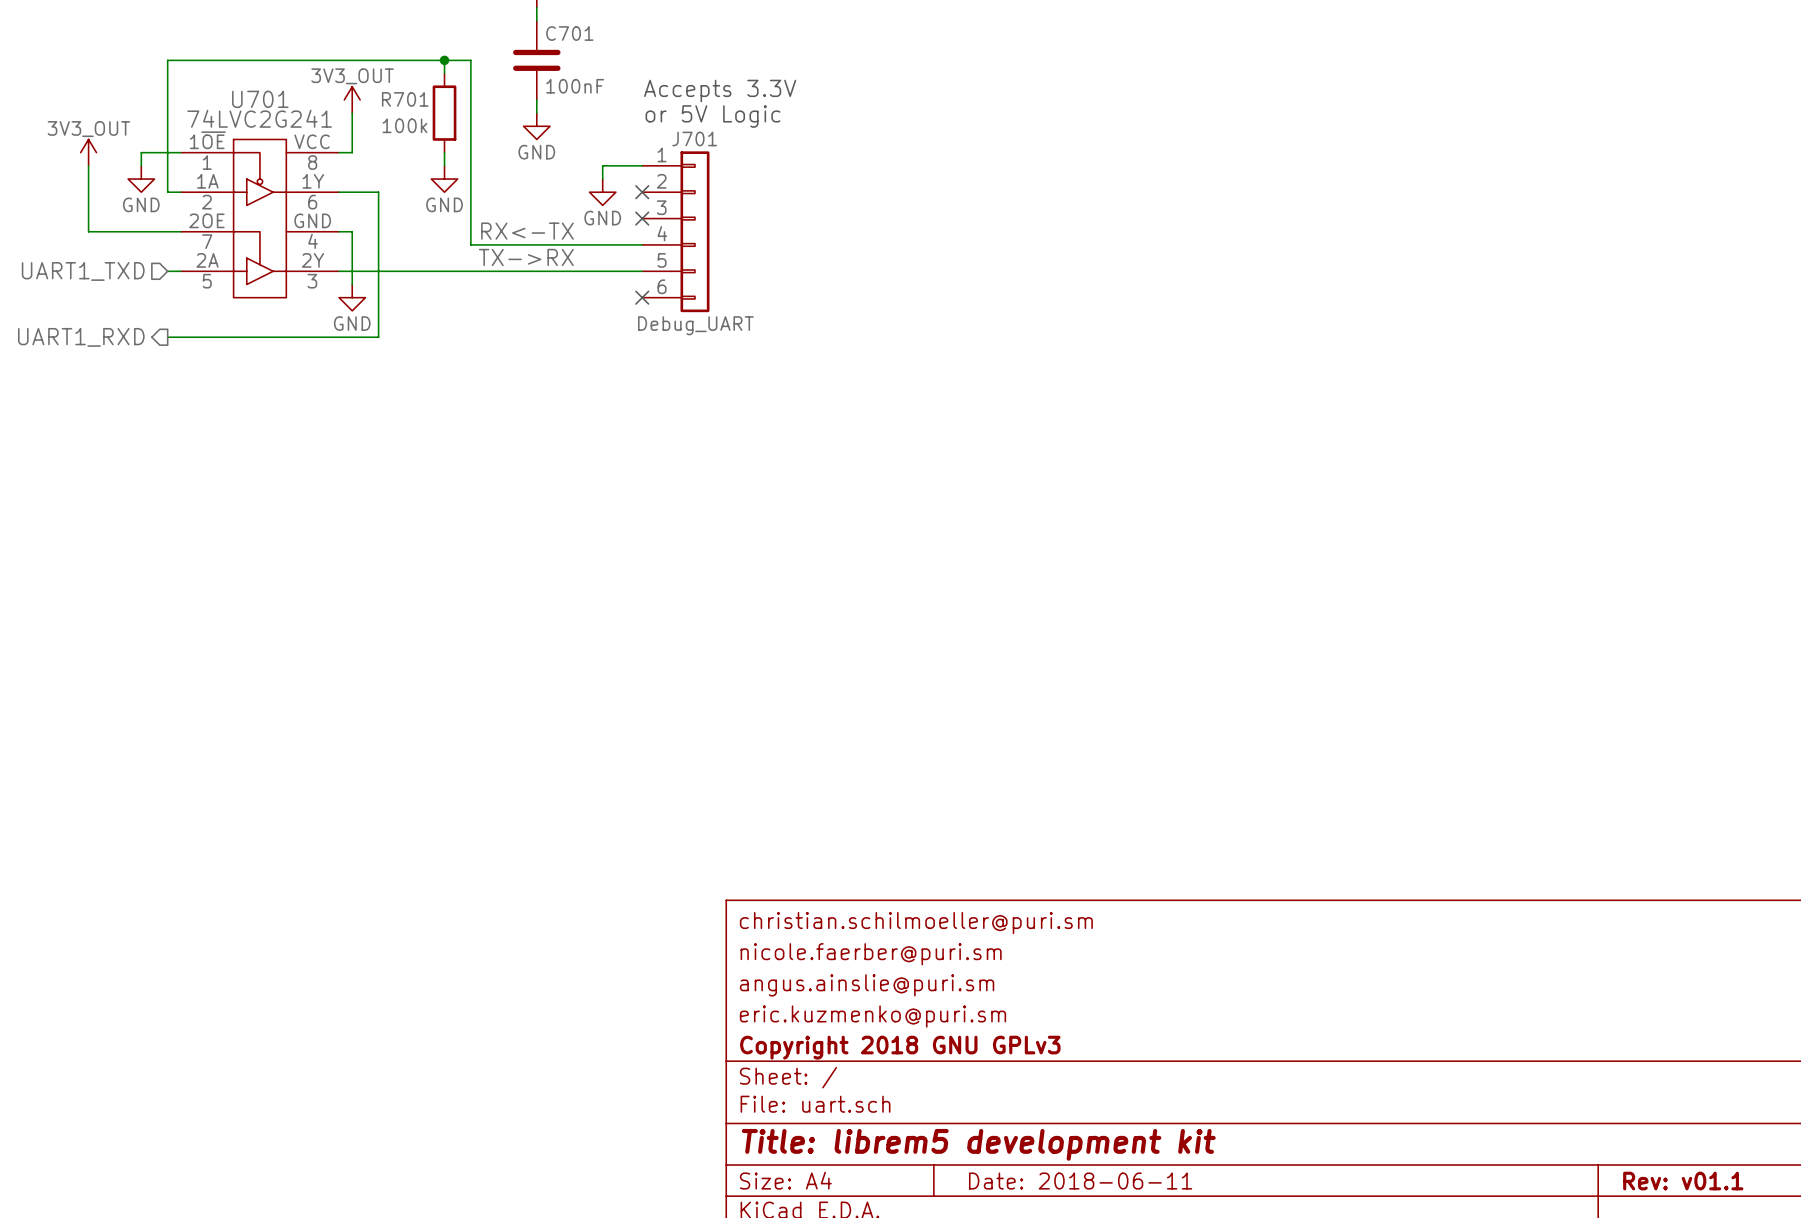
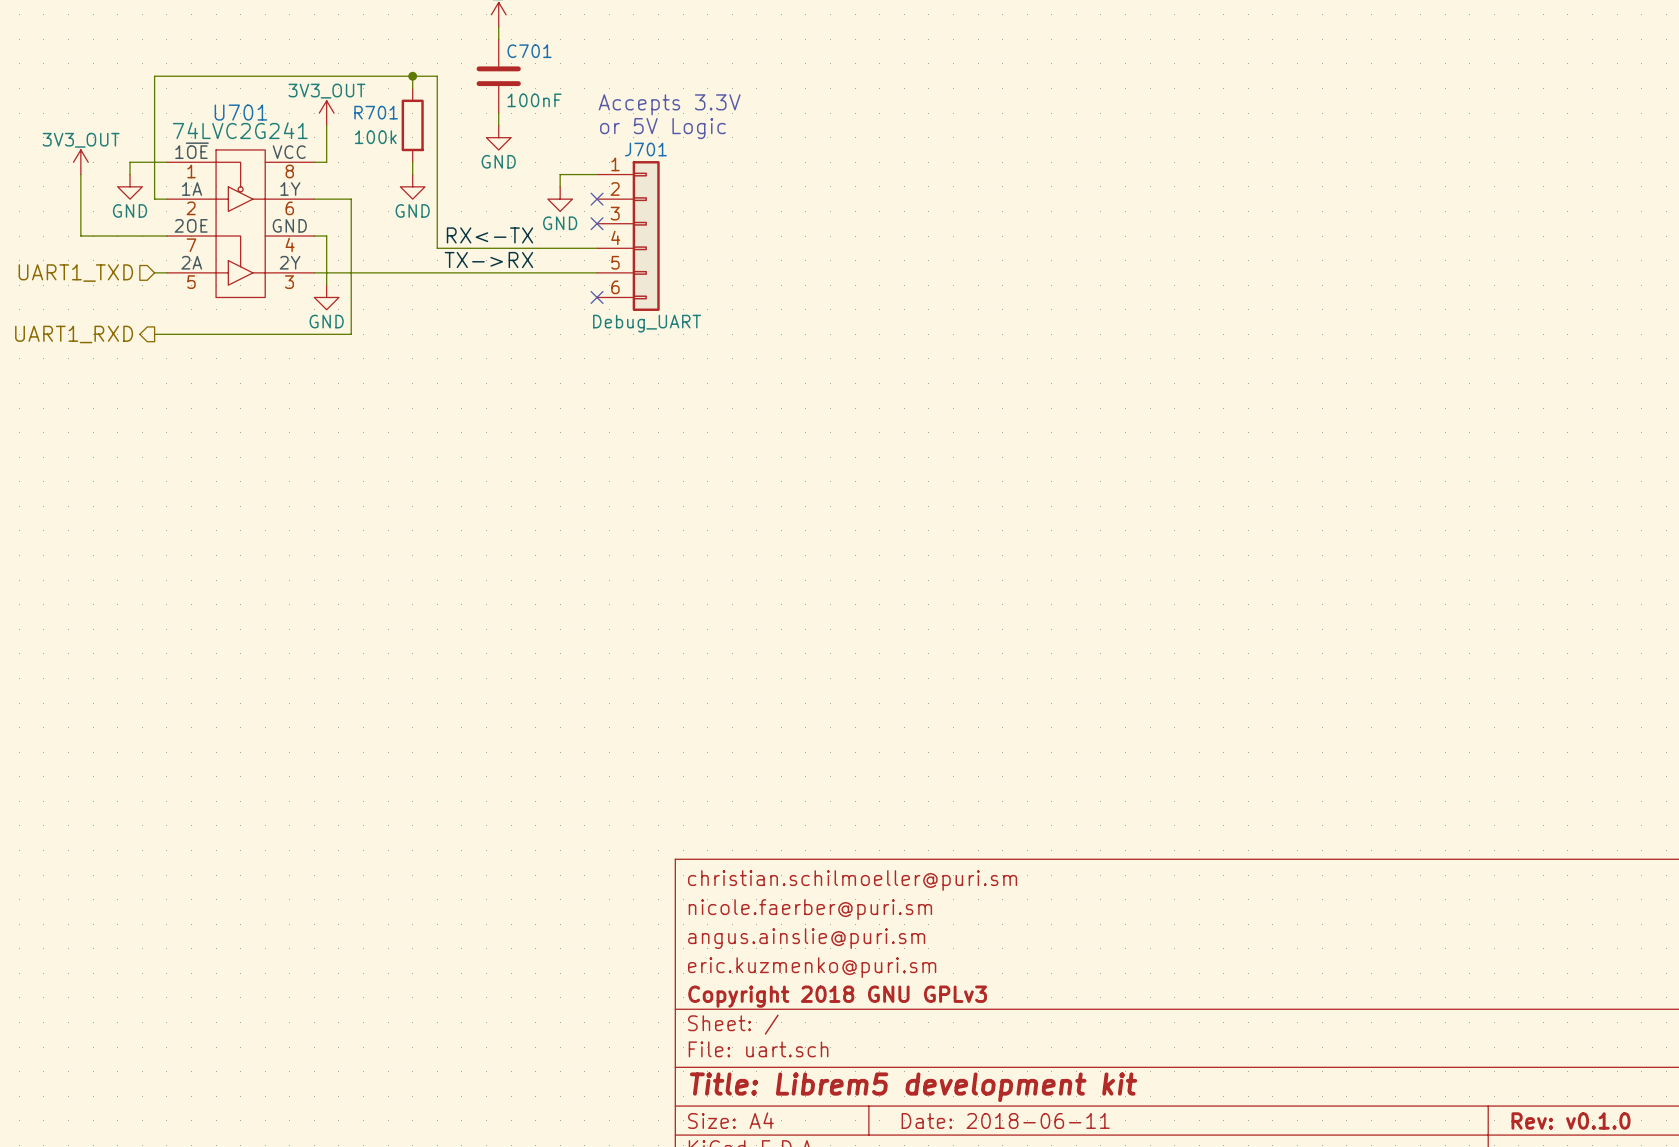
title block: Title: librem5 development kit (978, 1144) -> Title: Librem5 development kit (913, 1087)
title block: Rev: v01.1 (1683, 1181) -> Rev: v0.1.0 (1570, 1120)

